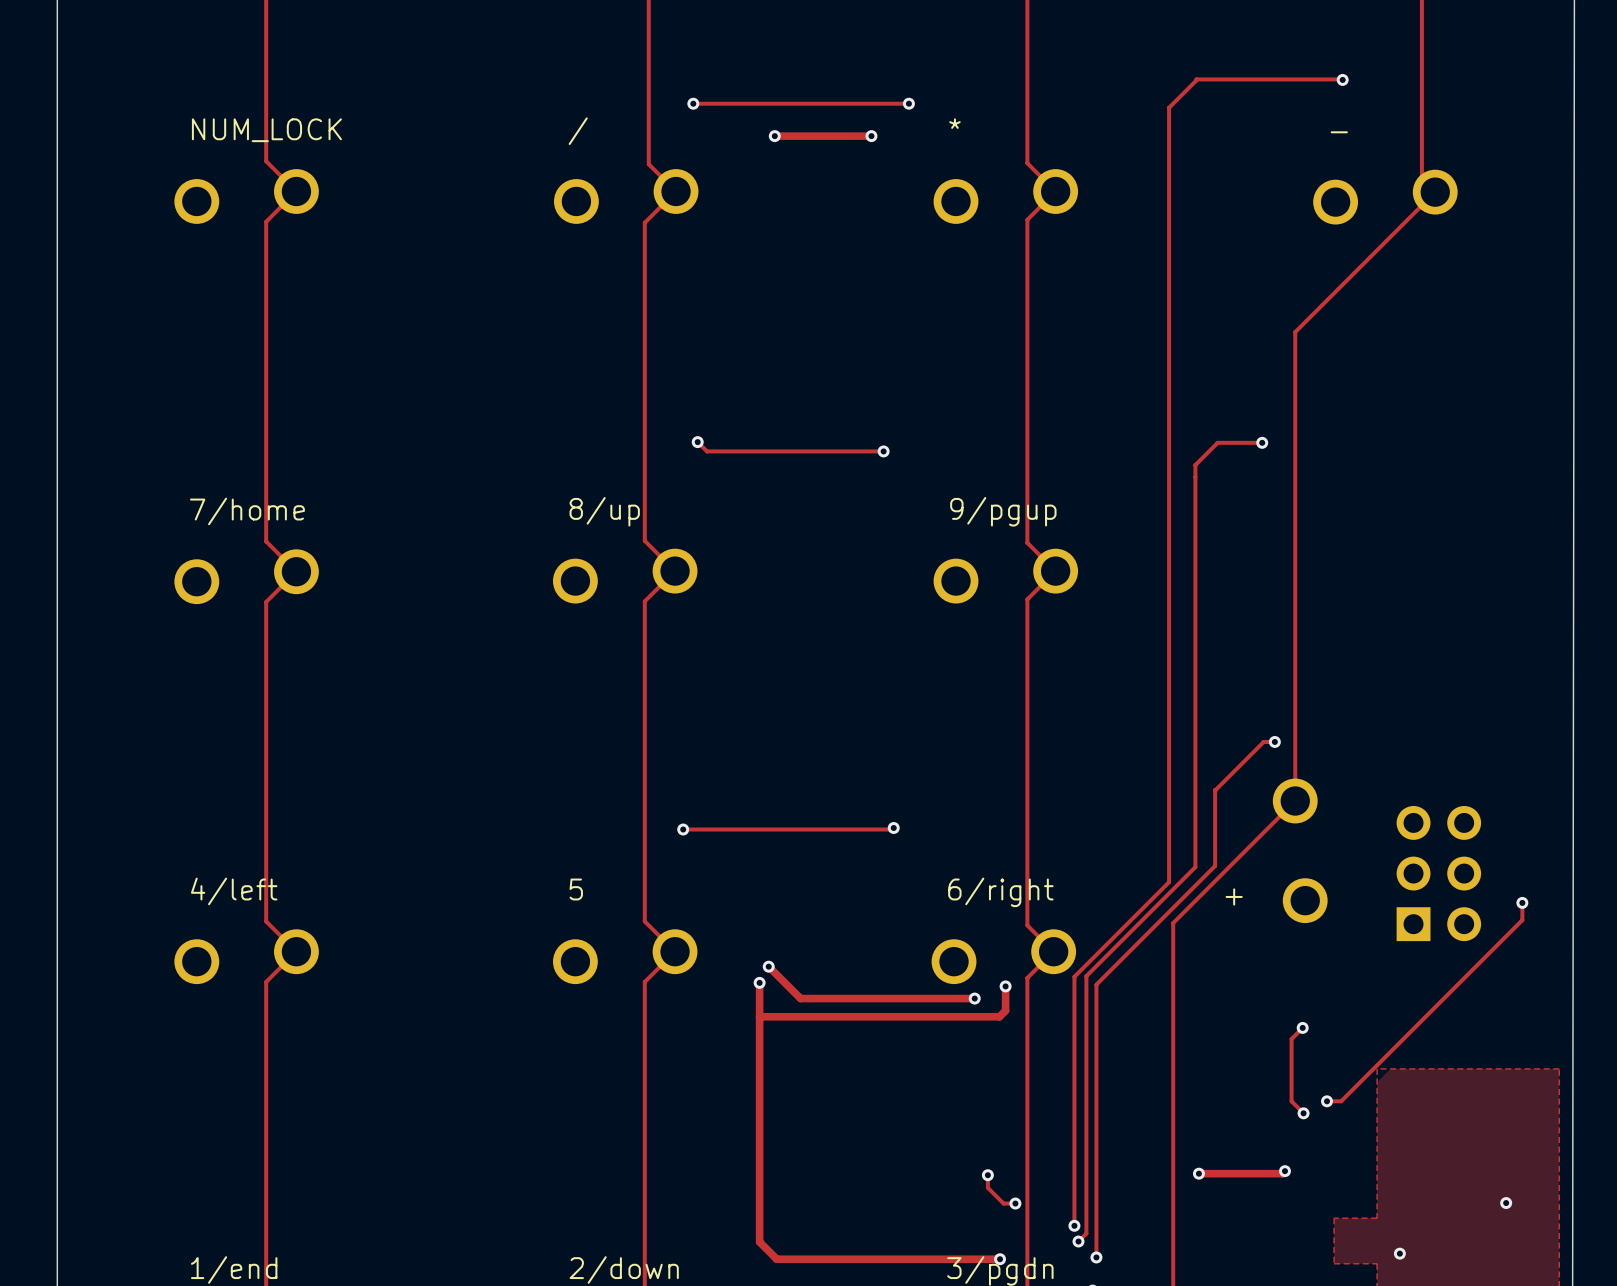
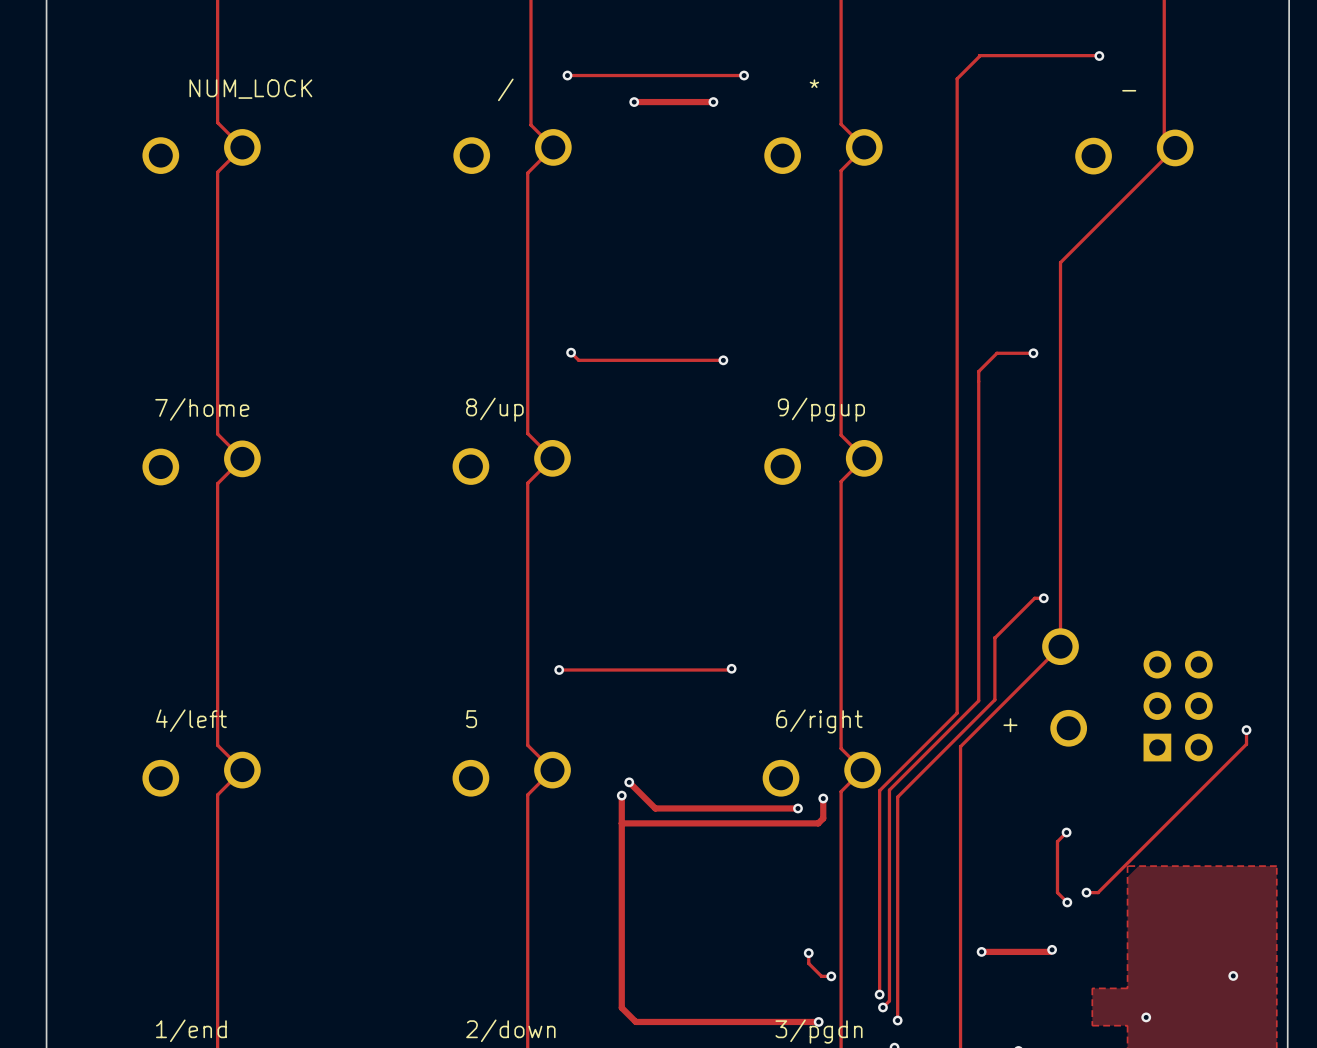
part value position: * (954, 123) -> * (814, 83)
part value position: NUM_LOCK (266, 130) -> NUM_LOCK (250, 89)
part value position: / (578, 131) -> / (505, 89)
part value position: - (1339, 132) -> - (1129, 90)

